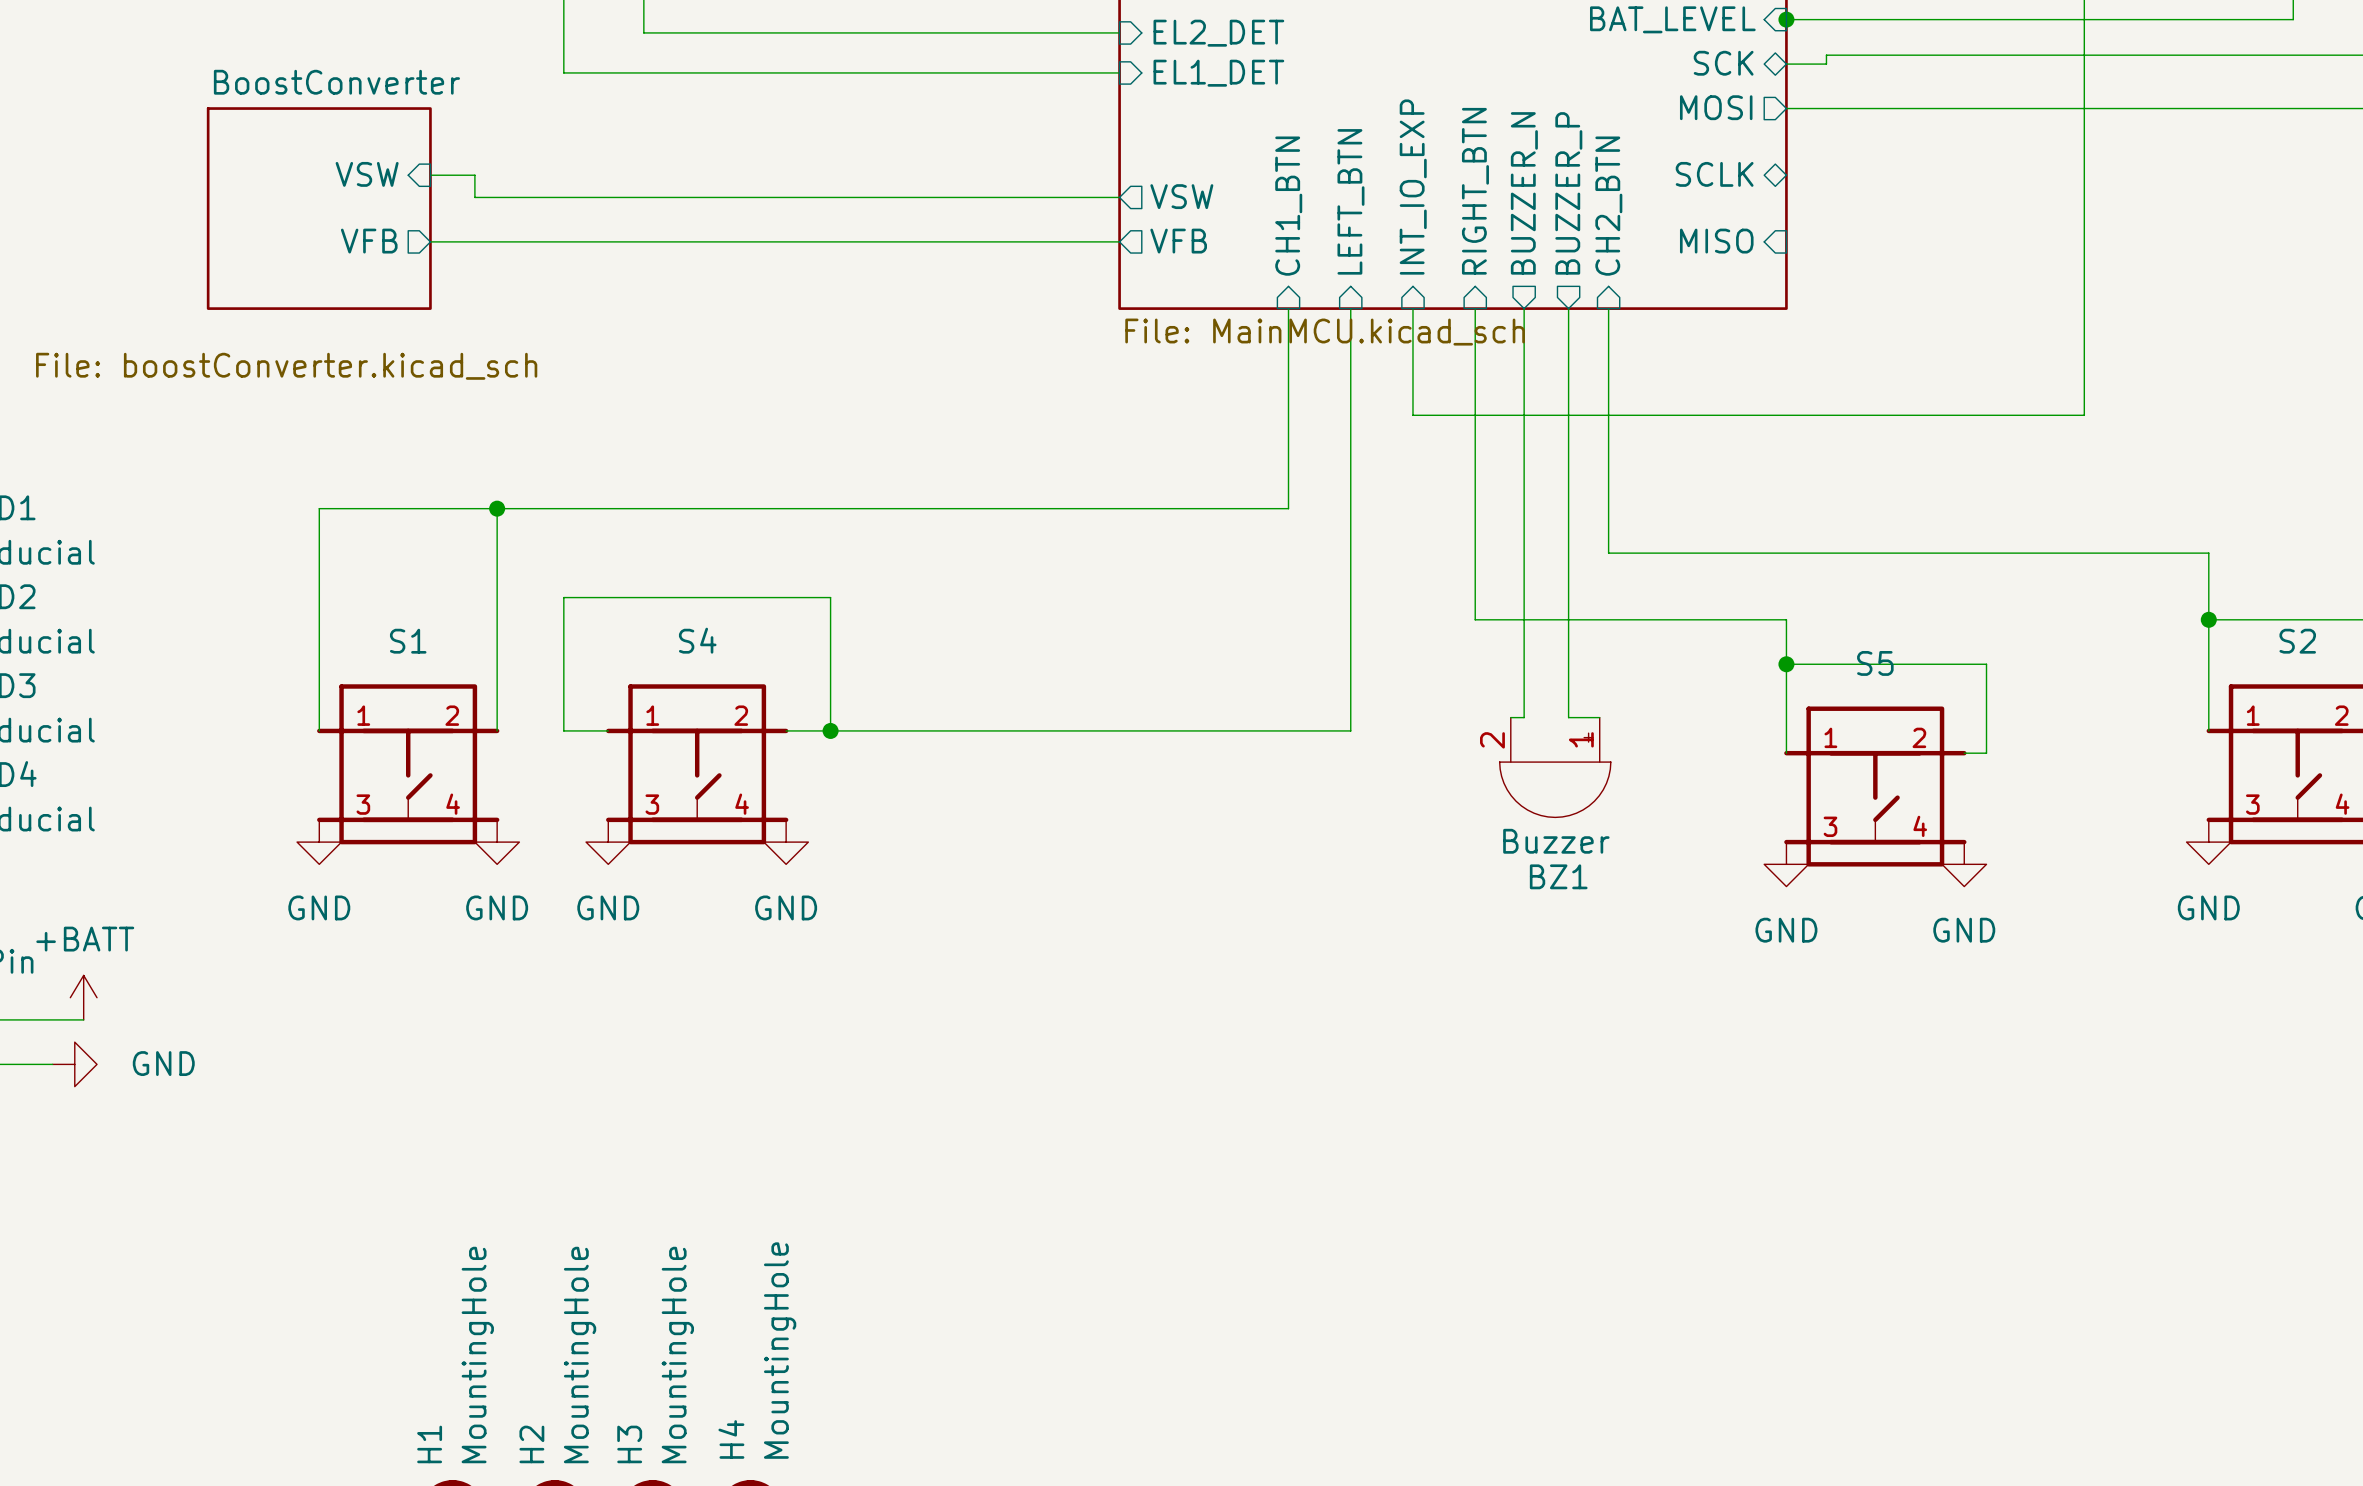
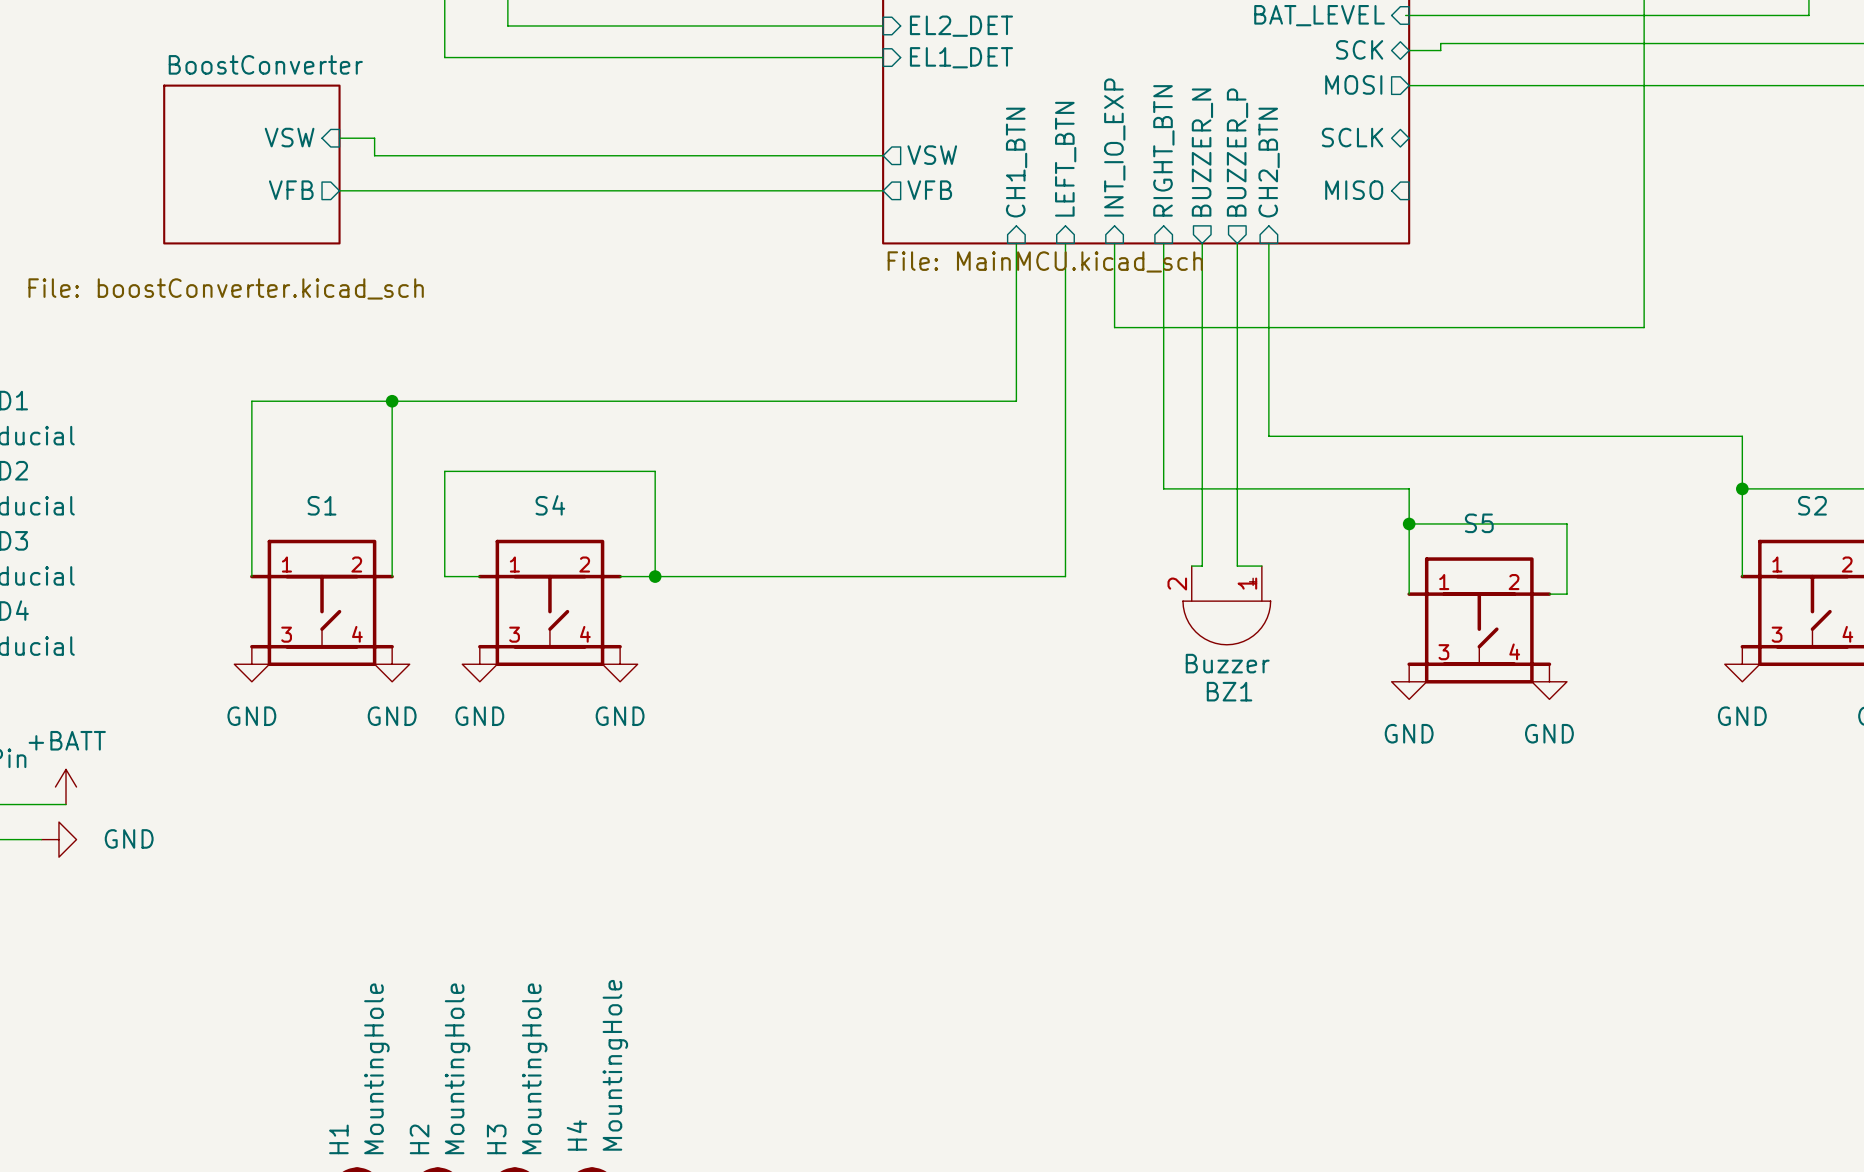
junction: (1786, 19) -> none

